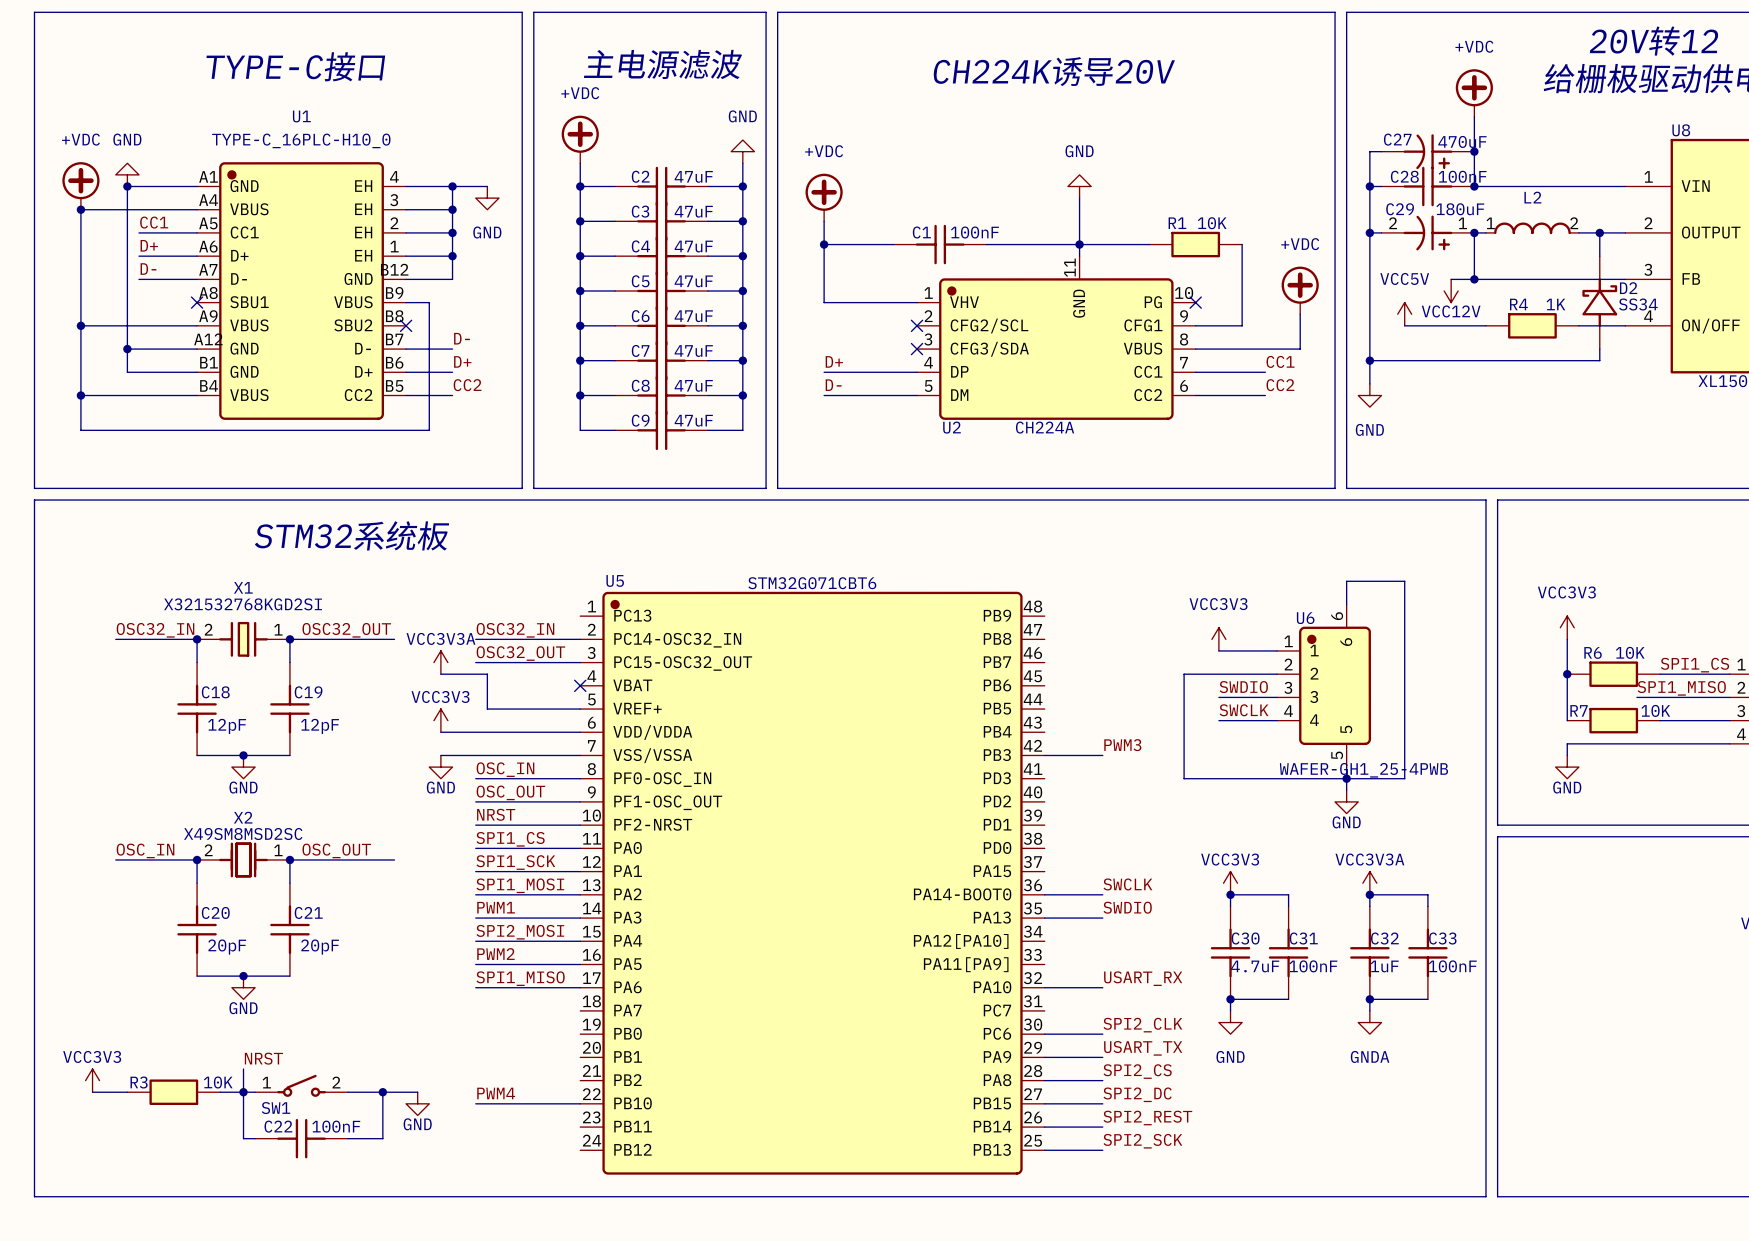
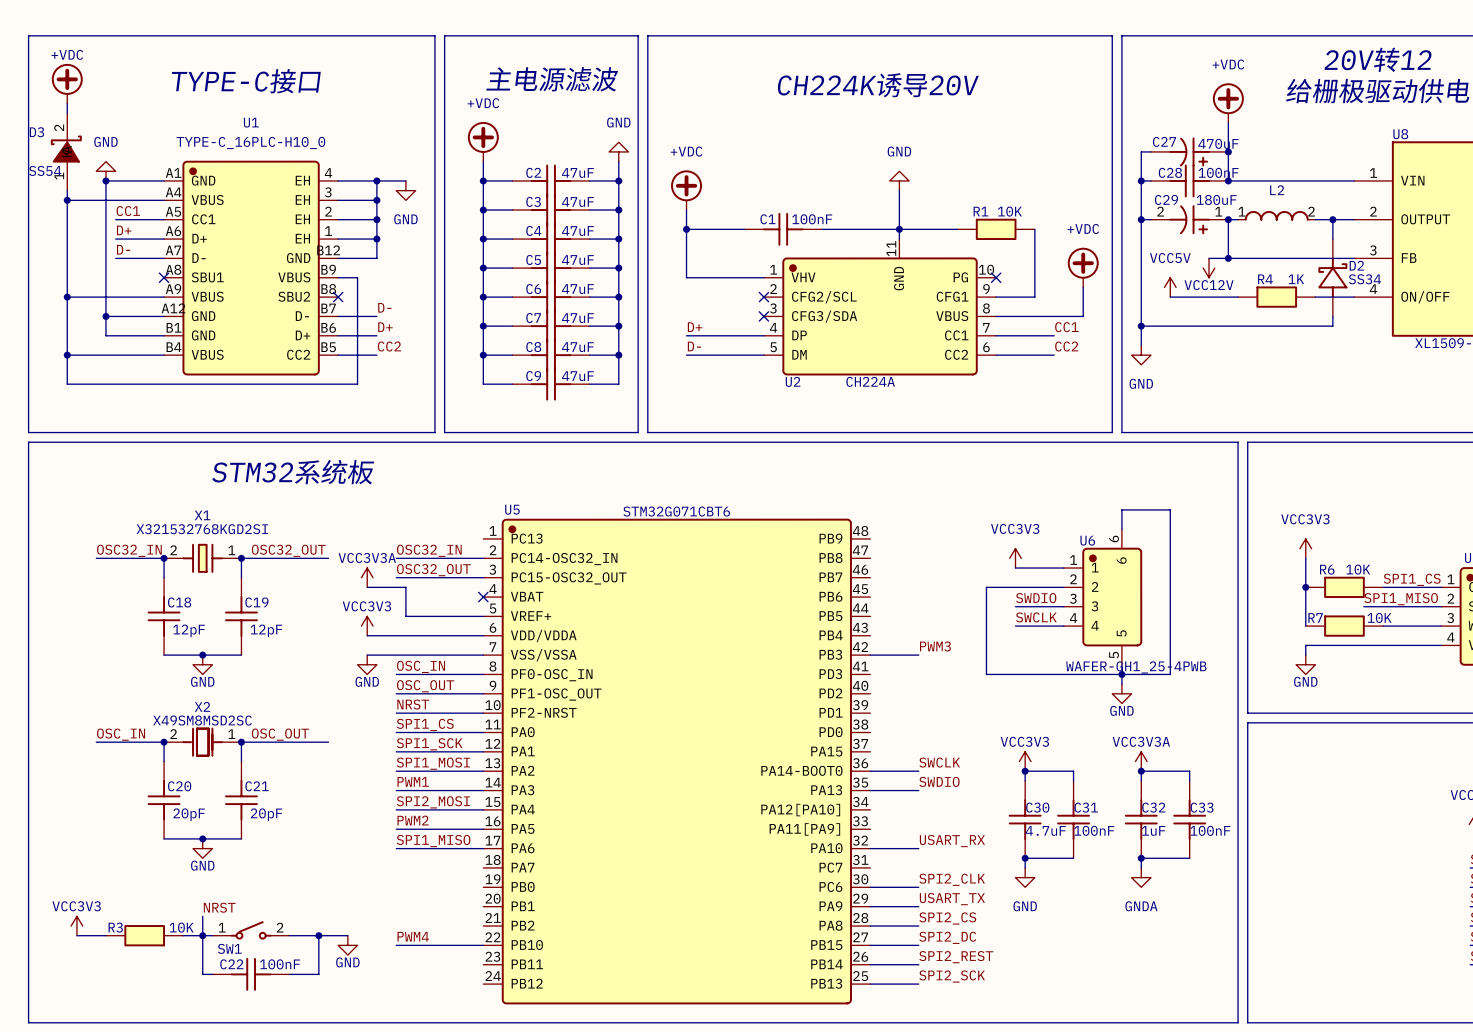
wire: none -> (67, 103) (67, 113)
power symbol text position: +VDC (80, 139) -> +VDC (67, 54)
D3: none -> SS54 (66, 151)
power symbol position: +VDC (80, 185) -> +VDC (67, 83)

